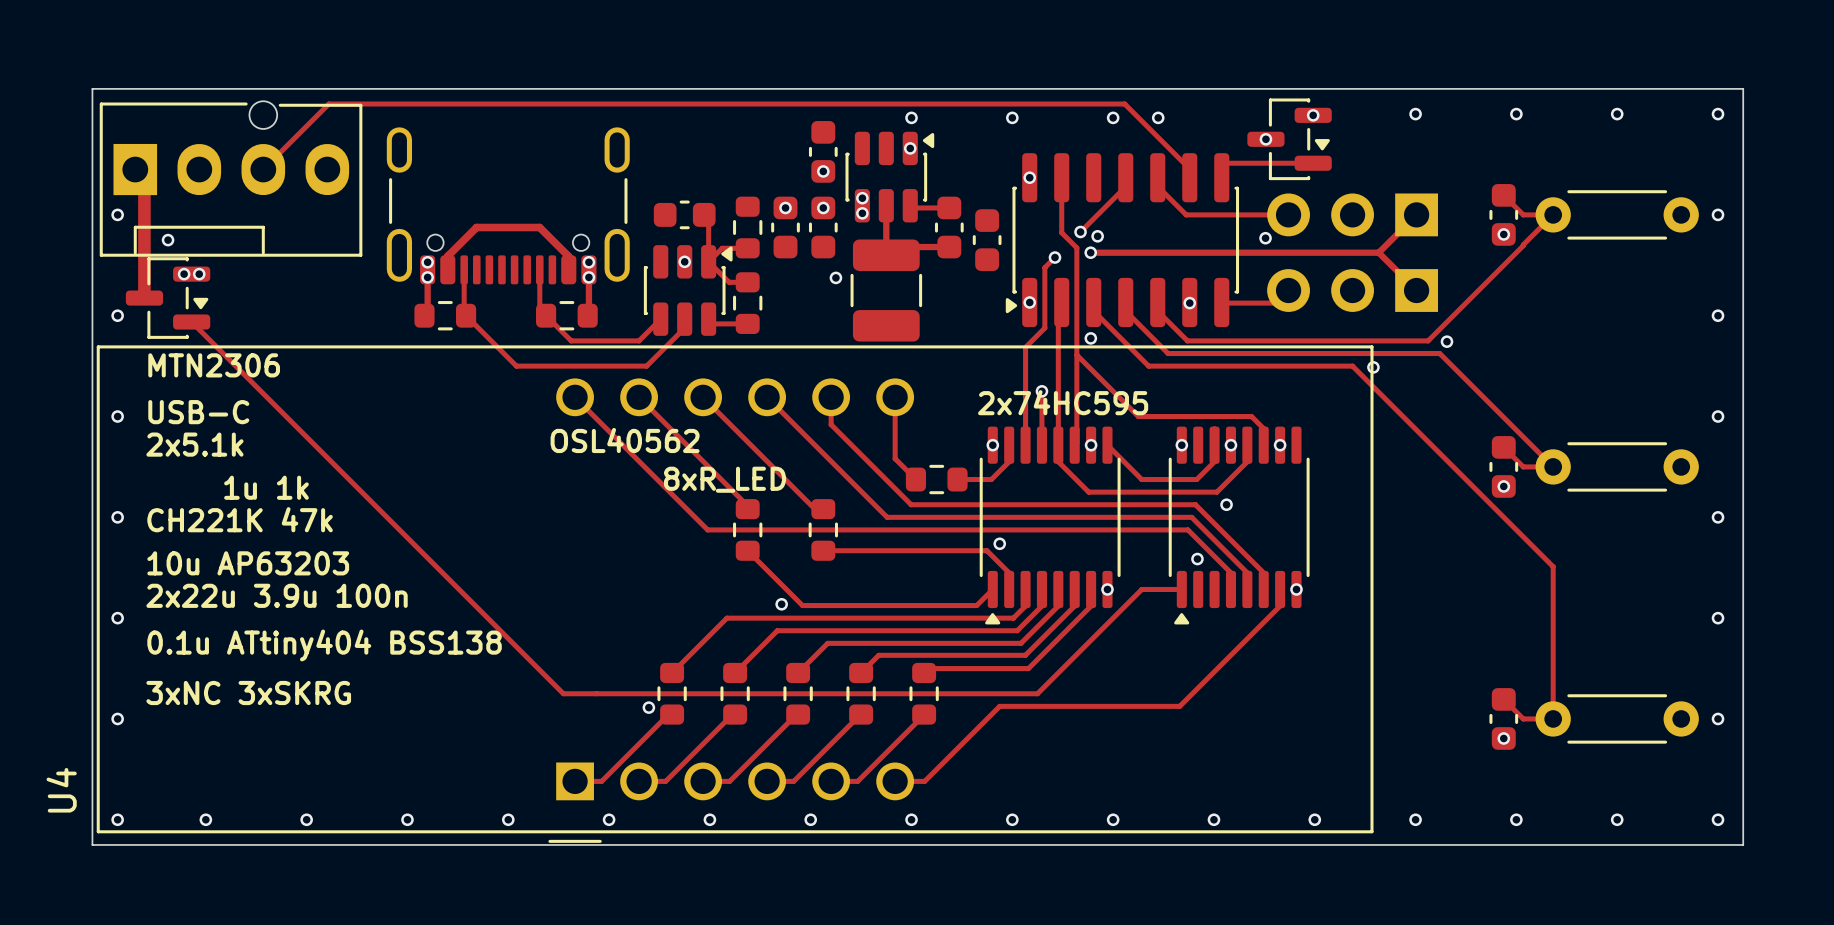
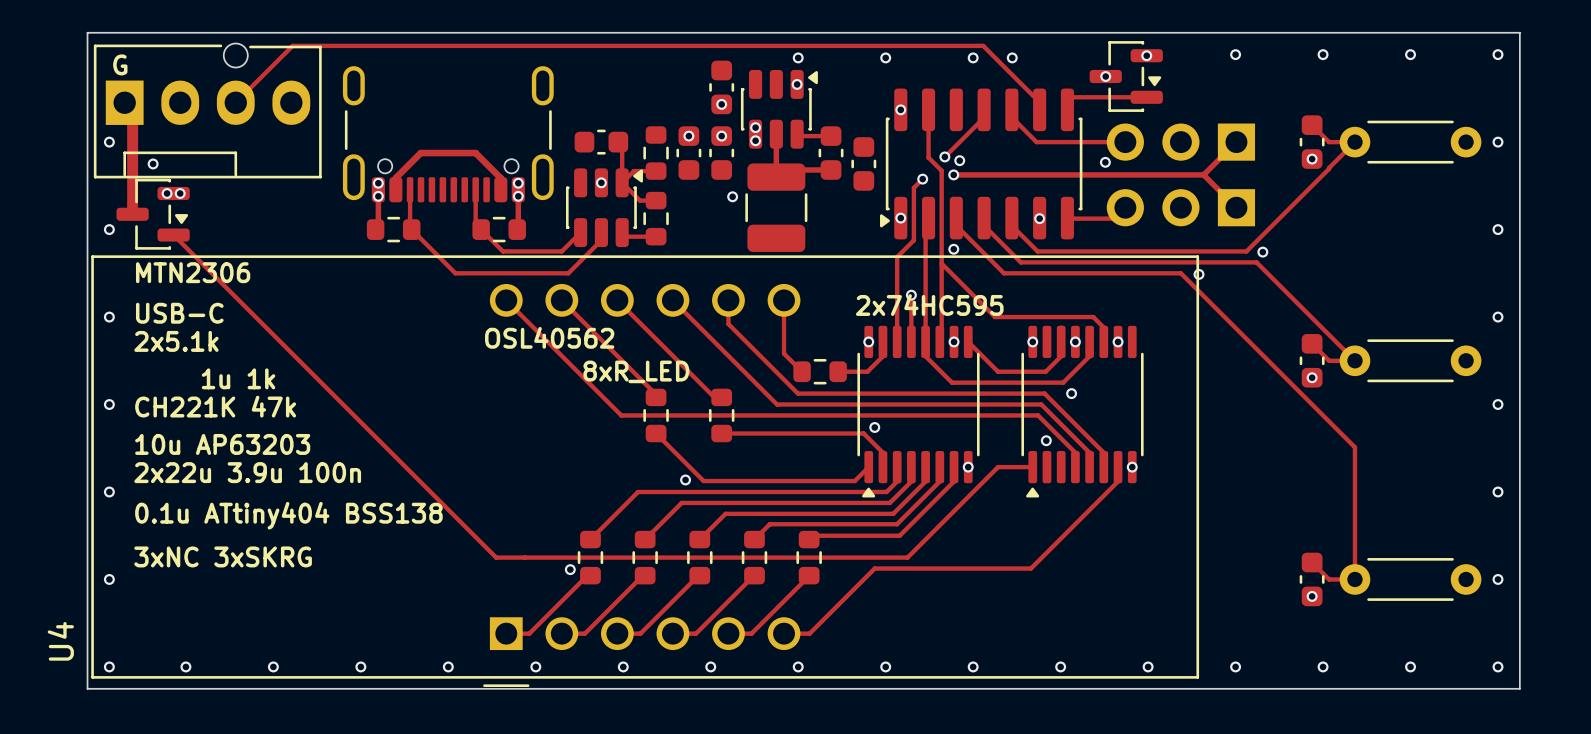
text: none -> G (120, 64)

